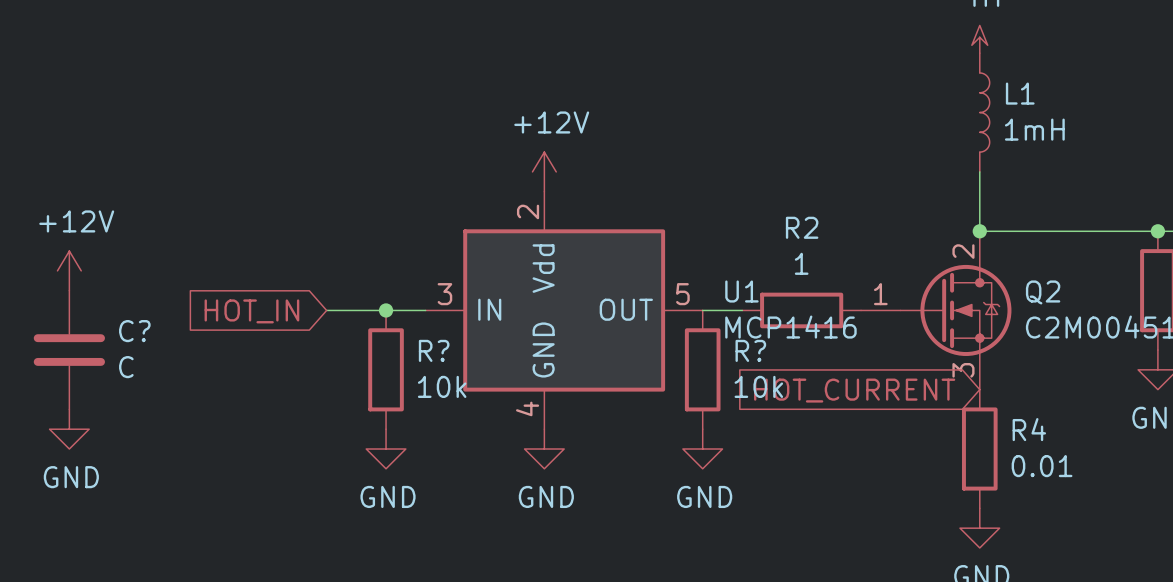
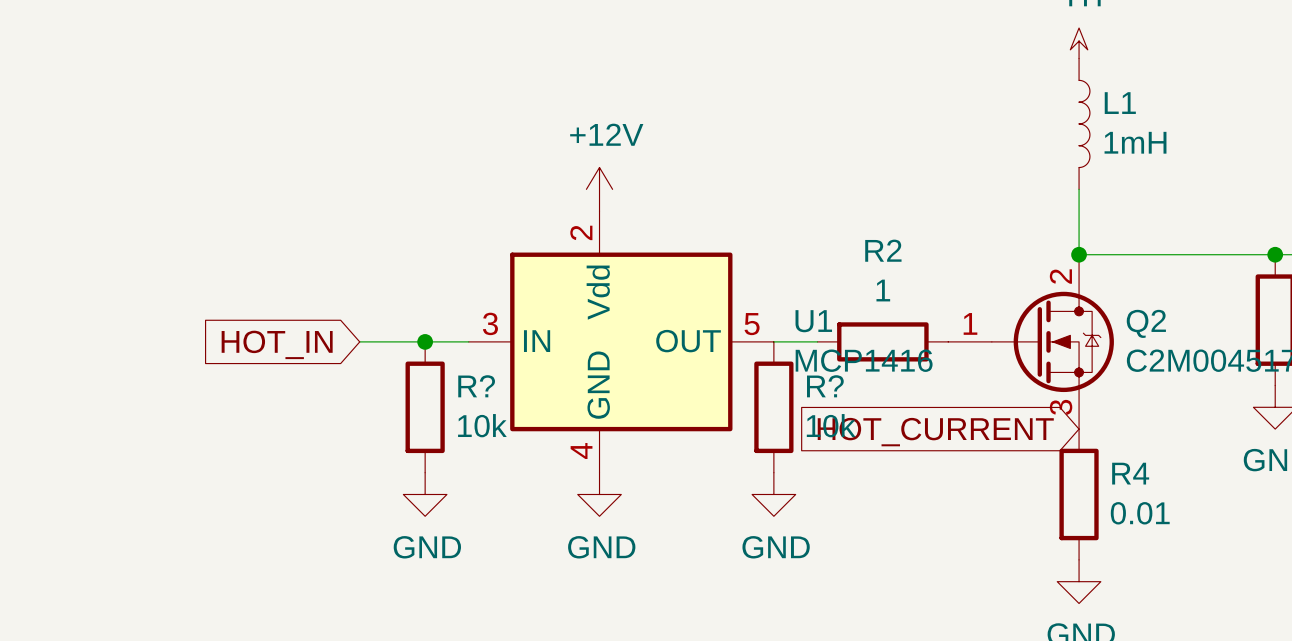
power symbol: +12V (69, 270) -> none
C?: C (69, 350) -> none
power symbol: GND (69, 429) -> none

